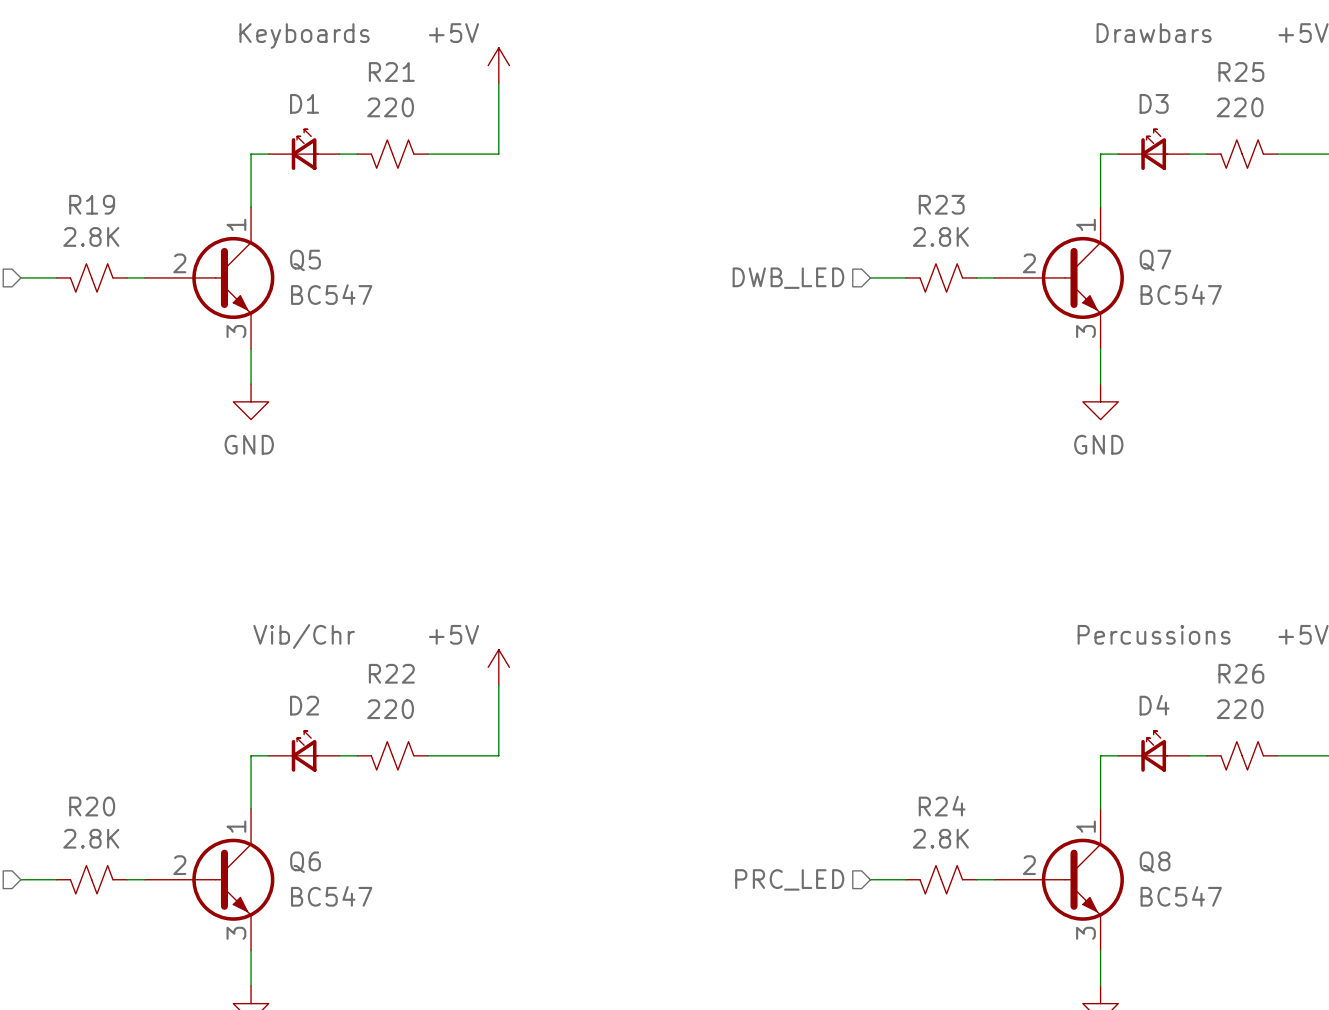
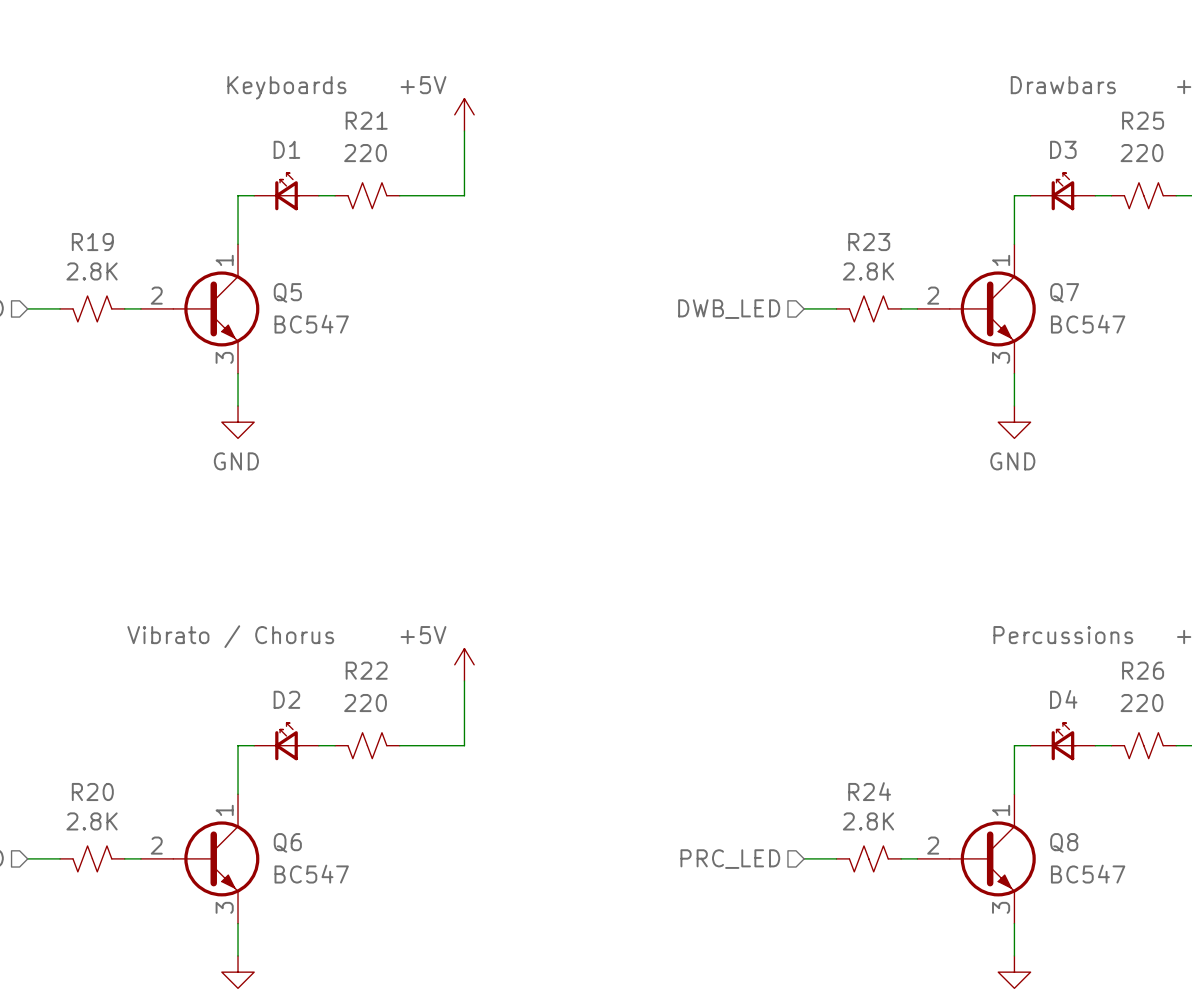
Q5 symbol: [144, 207, 275, 349] -> [140, 244, 260, 374]
Q7 symbol: [994, 207, 1124, 349] -> [917, 244, 1036, 374]
D2 value: Vib/Chr (304, 636) -> Vibrato / Chorus (230, 636)
Q6 symbol: [144, 808, 275, 951] -> [140, 794, 260, 924]
Q8 symbol: [994, 808, 1124, 951] -> [917, 794, 1036, 924]

